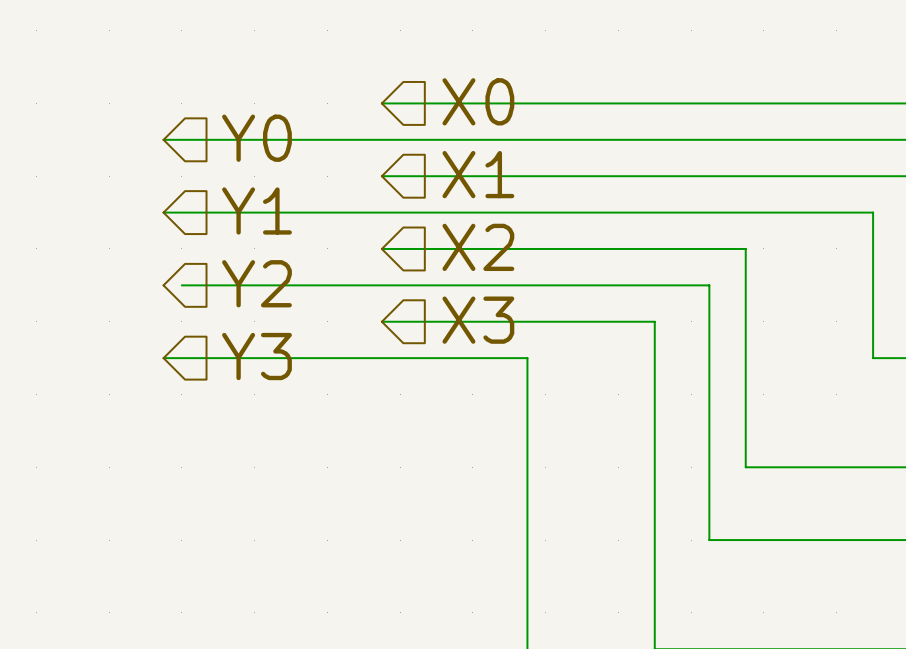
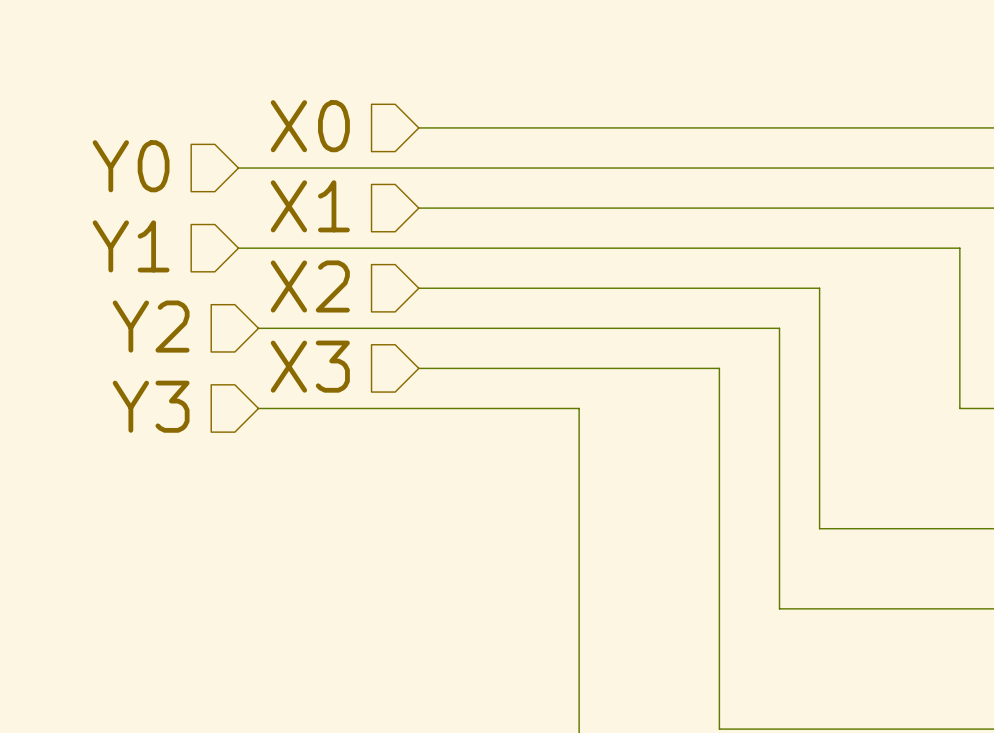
hierarchical label rotation: 0° (478, 101) -> 180° (310, 126)
hierarchical label position: X0 (478, 101) -> X0 (310, 126)
hierarchical label rotation: 0° (256, 138) -> 180° (131, 166)
hierarchical label position: Y0 (256, 138) -> Y0 (131, 166)
wire: (163, 139) (218, 139) -> none
hierarchical label rotation: 0° (478, 174) -> 180° (310, 206)
hierarchical label position: X1 (478, 174) -> X1 (310, 206)
hierarchical label rotation: 0° (256, 210) -> 180° (131, 246)
hierarchical label position: Y1 (256, 210) -> Y1 (131, 246)
wire: (163, 212) (218, 212) -> none
hierarchical label rotation: 0° (478, 247) -> 180° (310, 286)
hierarchical label position: X2 (478, 247) -> X2 (310, 286)
hierarchical label rotation: 0° (256, 283) -> 180° (151, 326)
hierarchical label position: Y2 (256, 283) -> Y2 (151, 326)
wire: (181, 285) (236, 285) -> none
hierarchical label rotation: 0° (478, 320) -> 180° (310, 366)
hierarchical label position: X3 (478, 320) -> X3 (310, 366)
hierarchical label rotation: 0° (256, 356) -> 180° (151, 406)
hierarchical label position: Y3 (256, 356) -> Y3 (151, 406)
wire: (163, 358) (236, 358) -> none

